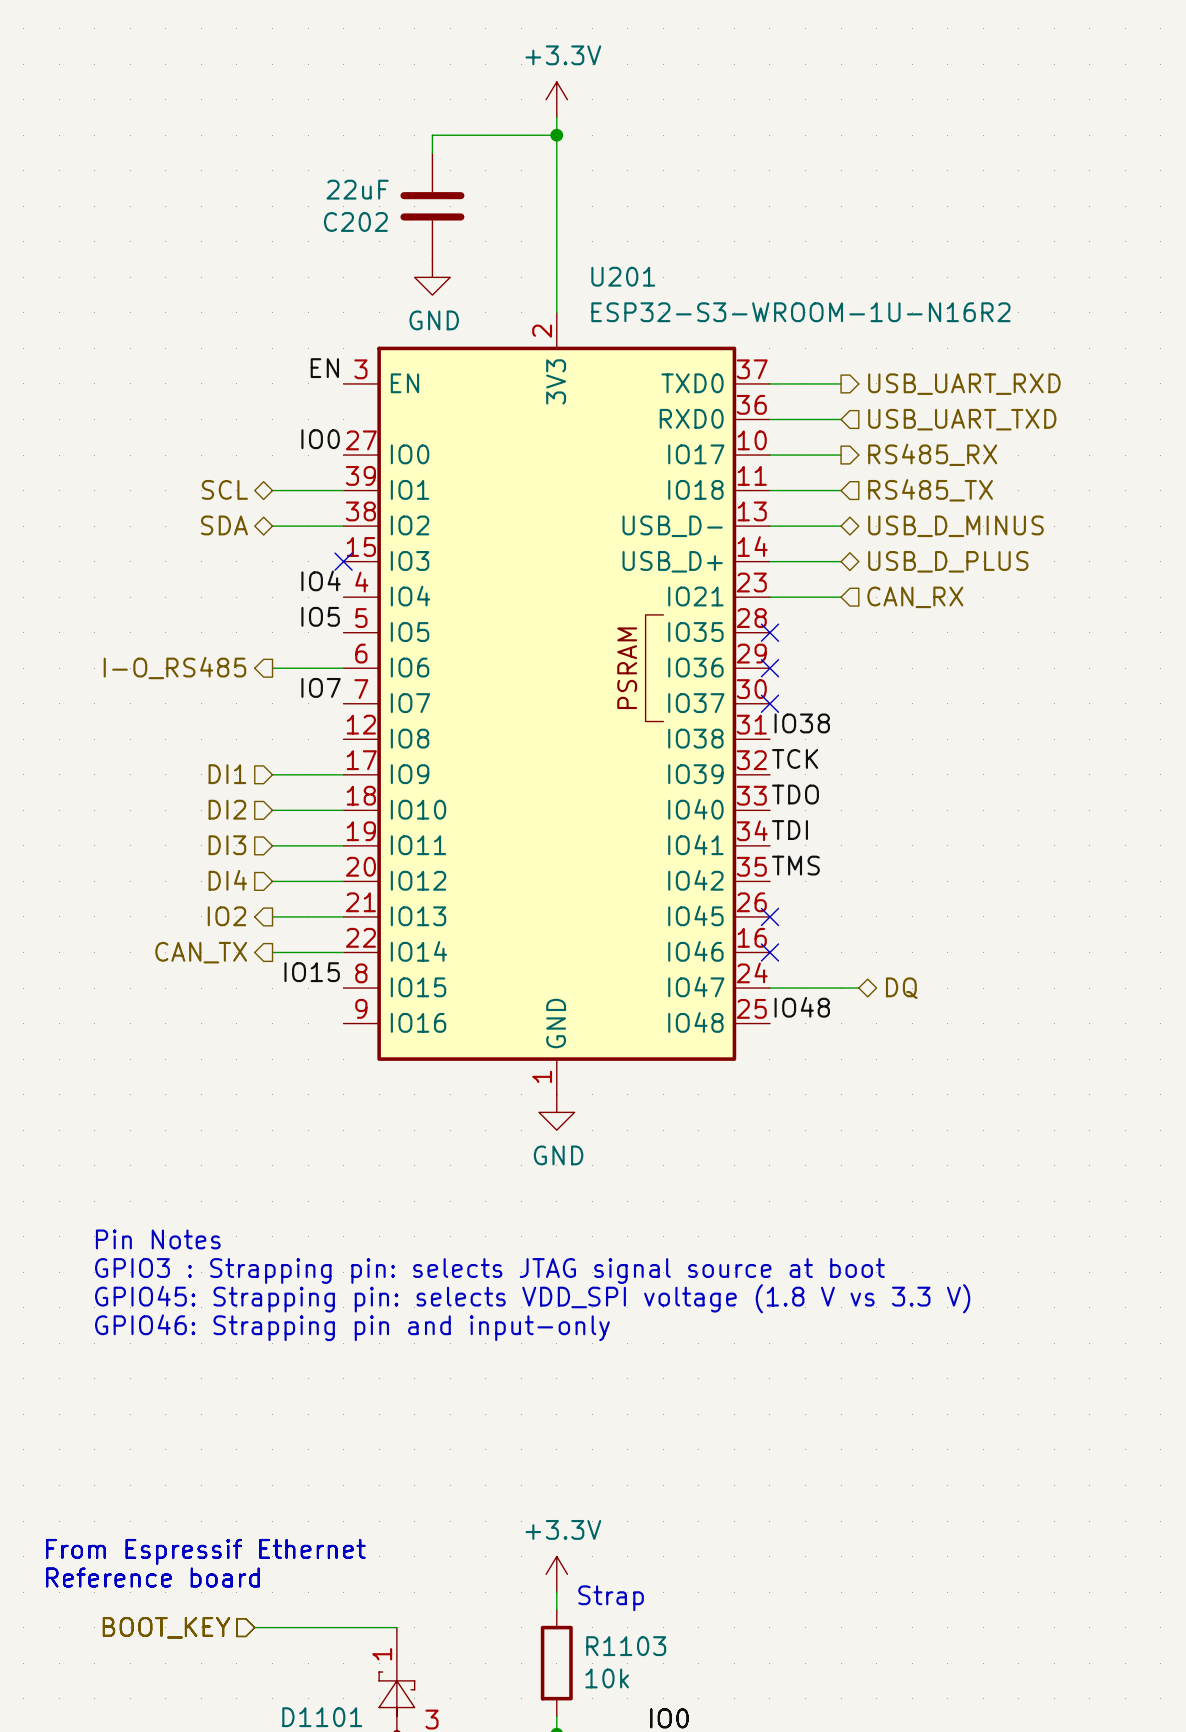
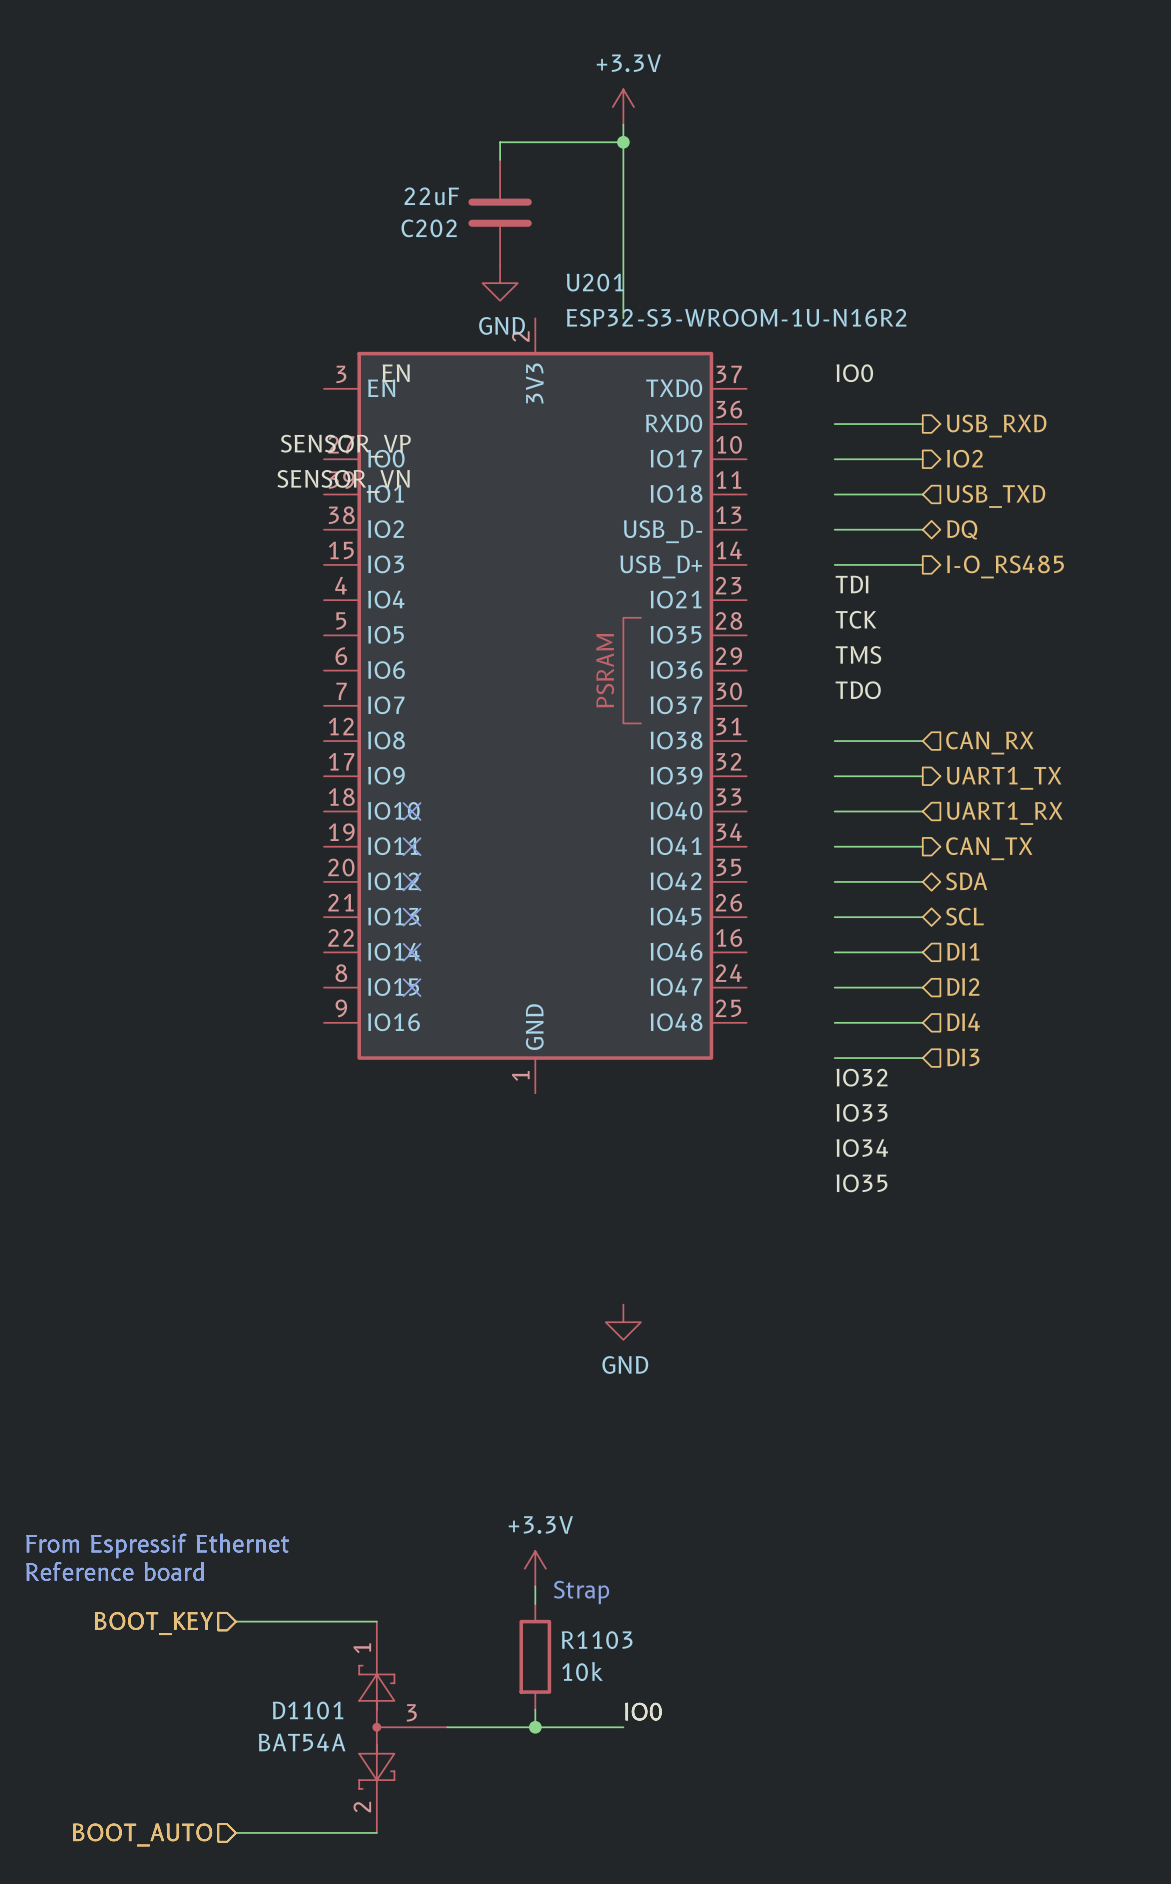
power symbol position: +3.3V (556, 99) -> +3.3V (623, 107)
wire: (556, 117) (556, 312) -> (623, 124) (623, 318)
wire: (521, 135) (432, 135) (432, 153) -> (500, 142) (500, 159)
wire: none -> (535, 142) (623, 142)
junction: (556, 135) -> none
junction: none -> (623, 142)
C202 position: (432, 206) -> (500, 212)
power symbol position: GND (432, 277) -> GND (500, 283)
label position: EN (324, 368) -> EN (396, 373)
label: none -> IO0 (854, 373)
wire: (769, 383) (841, 383) -> none
hierarchical label: USB_UART_RXD (964, 384) -> none
wire: (769, 419) (841, 419) -> none
wire: none -> (834, 424) (922, 424)
hierarchical label: USB_UART_TXD (962, 419) -> none
hierarchical label: none -> USB_RXD (996, 426)
label: IO0 (320, 439) -> none
label: none -> SENSOR_VP (345, 446)
hierarchical label: RS485_RX (932, 454) -> none
hierarchical label: none -> IO2 (964, 458)
wire: (769, 455) (841, 455) -> none
wire: none -> (834, 459) (922, 459)
label: none -> SENSOR_VN (343, 481)
hierarchical label: SCL (224, 489) -> none
wire: (272, 490) (343, 490) -> none
wire: (769, 490) (841, 490) -> none
wire: none -> (834, 494) (922, 494)
hierarchical label: RS485_TX (930, 490) -> none
hierarchical label: none -> USB_TXD (996, 496)
hierarchical label: SDA (224, 525) -> none
wire: (272, 526) (343, 526) -> none
wire: (769, 526) (841, 526) -> none
wire: none -> (834, 529) (922, 529)
hierarchical label: USB_D_MINUS (955, 526) -> none
hierarchical label: none -> DQ (962, 529)
no-connect mark: (343, 561) -> none
wire: (769, 561) (841, 561) -> none
wire: none -> (834, 564) (922, 564)
hierarchical label: USB_D_PLUS (948, 561) -> none
hierarchical label: none -> I-O_RS485 (1005, 566)
label: IO4 (321, 580) -> none
wire: (769, 597) (841, 597) -> none
hierarchical label position: CAN_RX (915, 597) -> CAN_RX (989, 743)
label: IO5 (320, 616) -> none
no-connect mark: (769, 632) -> none
hierarchical label: I-O_RS485 (174, 667) -> none
wire: (272, 668) (343, 668) -> none
no-connect mark: (769, 668) -> none
label: IO7 (321, 687) -> none
no-connect mark: (769, 703) -> none
label: IO38 (802, 723) -> none
wire: none -> (834, 741) (922, 741)
label position: TCK (795, 758) -> TCK (855, 619)
hierarchical label: DI1 (227, 774) -> none
wire: (272, 774) (343, 774) -> none
wire: none -> (834, 776) (922, 776)
hierarchical label: none -> UART1_TX (1004, 778)
label position: TDO (795, 794) -> TDO (858, 690)
hierarchical label: DI2 (227, 809) -> none
wire: (272, 810) (343, 810) -> none
no-connect mark: none -> (412, 811)
wire: none -> (834, 811) (922, 811)
hierarchical label: none -> UART1_RX (1004, 813)
label position: TDI (789, 830) -> TDI (851, 584)
hierarchical label: DI3 (227, 845) -> none
wire: (272, 845) (343, 845) -> none
no-connect mark: none -> (412, 846)
wire: none -> (834, 846) (922, 846)
hierarchical label: none -> CAN_TX (989, 848)
label position: TMS (795, 865) -> TMS (858, 654)
hierarchical label: DI4 (227, 880) -> none
hierarchical label: none -> SDA (966, 881)
wire: (272, 881) (343, 881) -> none
no-connect mark: none -> (412, 881)
wire: none -> (834, 881) (922, 881)
hierarchical label: IO2 (226, 916) -> none
wire: (272, 916) (343, 916) -> none
no-connect mark: none -> (412, 917)
no-connect mark: (769, 916) -> none
wire: none -> (834, 917) (922, 917)
hierarchical label: none -> SCL (964, 916)
hierarchical label: none -> DI1 (963, 951)
hierarchical label: CAN_TX (201, 952) -> none
wire: (272, 952) (343, 952) -> none
no-connect mark: none -> (412, 952)
no-connect mark: (769, 952) -> none
wire: none -> (834, 952) (922, 952)
label: IO15 (312, 972) -> none
hierarchical label: none -> DI2 (963, 986)
no-connect mark: none -> (412, 987)
wire: (769, 988) (858, 988) -> (922, 987) (834, 987)
hierarchical label: DQ (901, 988) -> none
label: IO48 (802, 1007) -> none
hierarchical label: none -> DI4 (963, 1022)
wire: none -> (834, 1022) (922, 1022)
hierarchical label: none -> DI3 (963, 1057)
wire: none -> (834, 1058) (922, 1058)
label: none -> IO32 (862, 1077)
power symbol position: GND (556, 1112) -> GND (623, 1322)
label: none -> IO33 (862, 1112)
label: none -> IO34 (862, 1148)
label: none -> IO35 (861, 1183)
text: Pin Notes (158, 1239) -> none
text: GPIO3 : Strapping pin: selects JTAG signal source at boot (489, 1270) -> none
text: GPIO45: Strapping pin: selects VDD_SPI voltage (1.8 V vs 3.3 V) (532, 1298) -> none
text: GPIO46: Strapping pin and input-only (352, 1327) -> none

